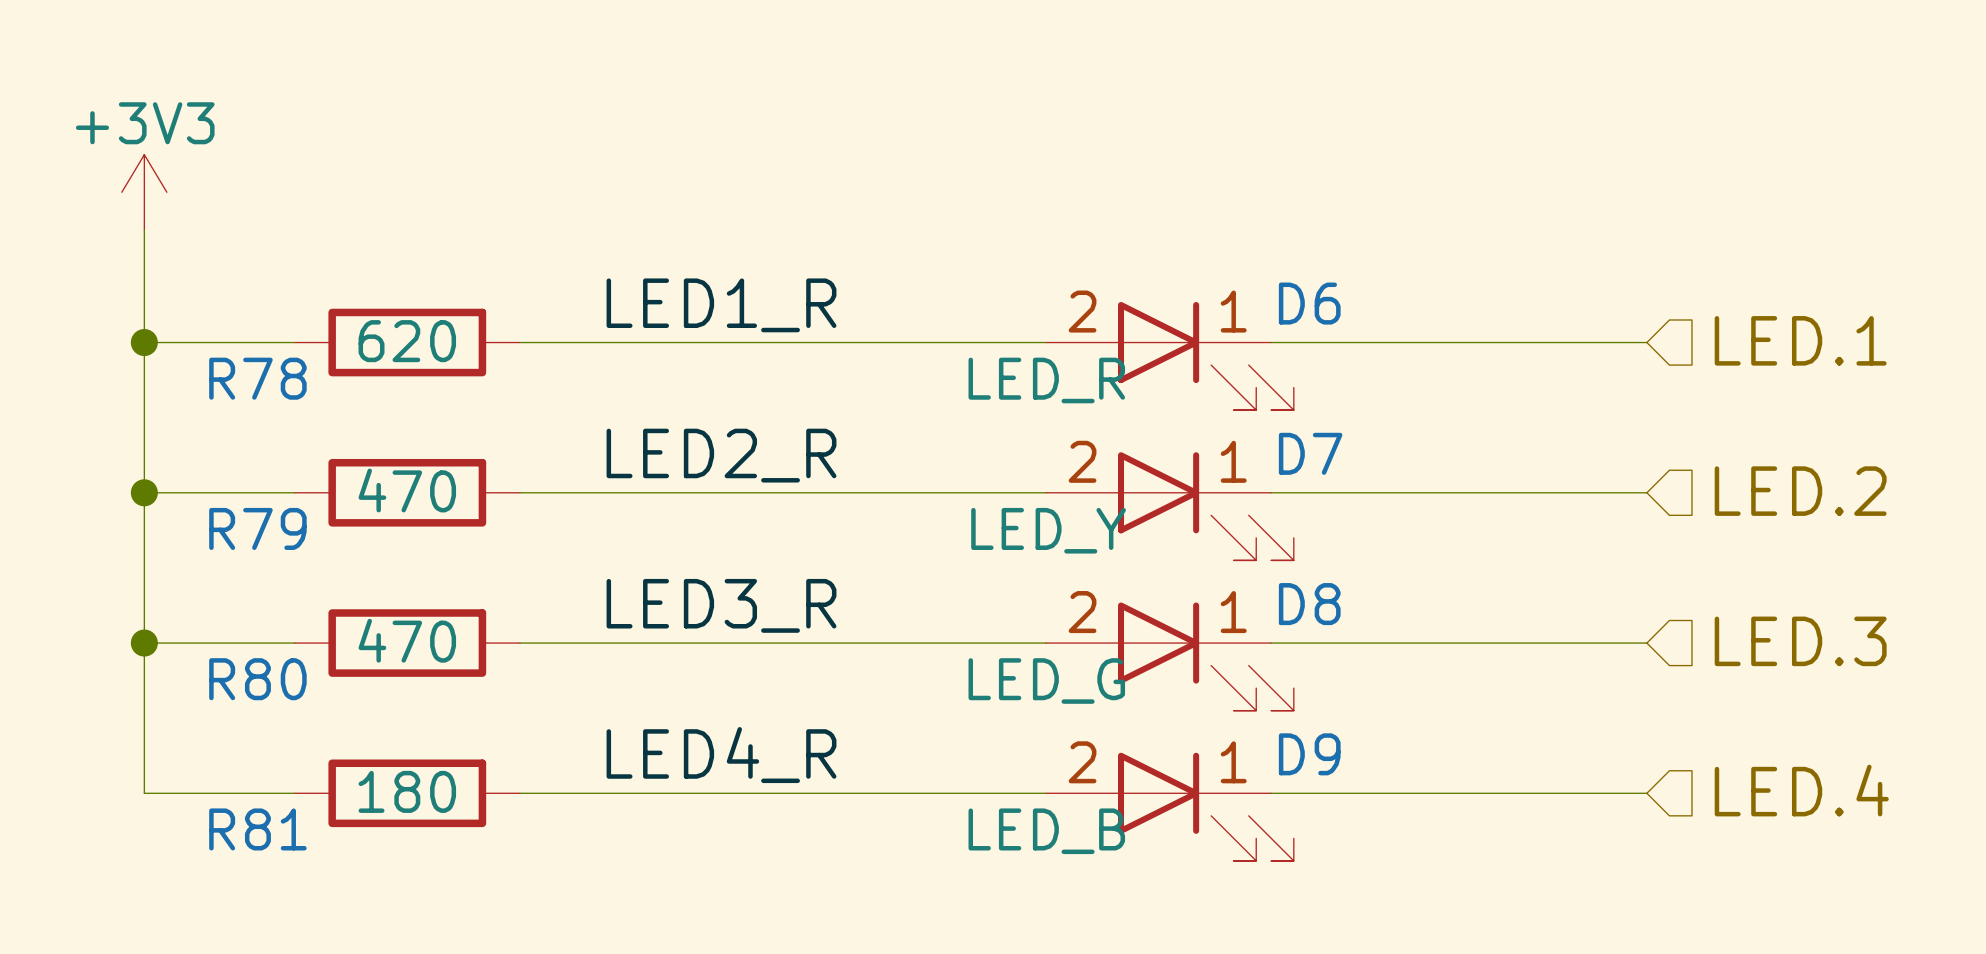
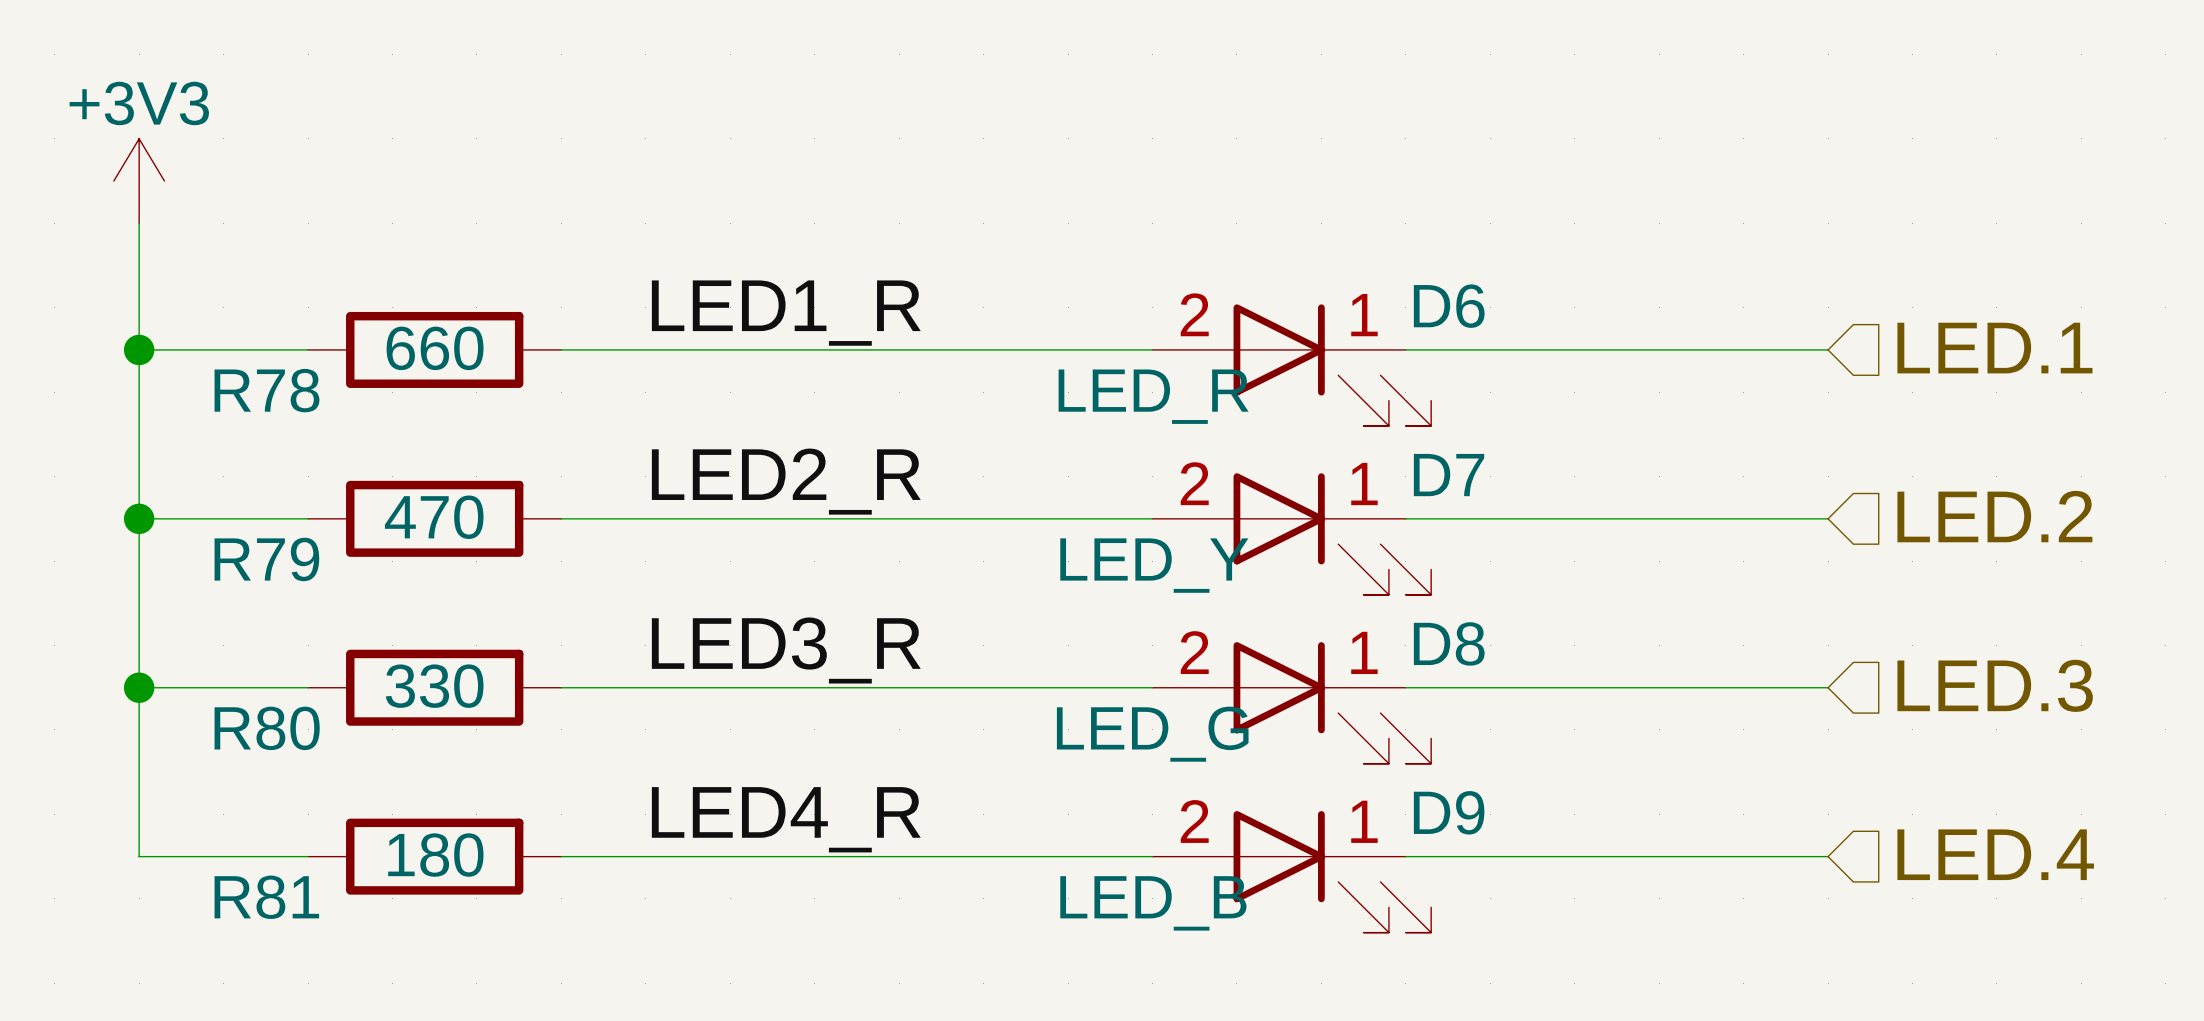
R78 value: 620 (407, 341) -> 660 (435, 348)
R80 value: 470 (407, 640) -> 330 (434, 686)

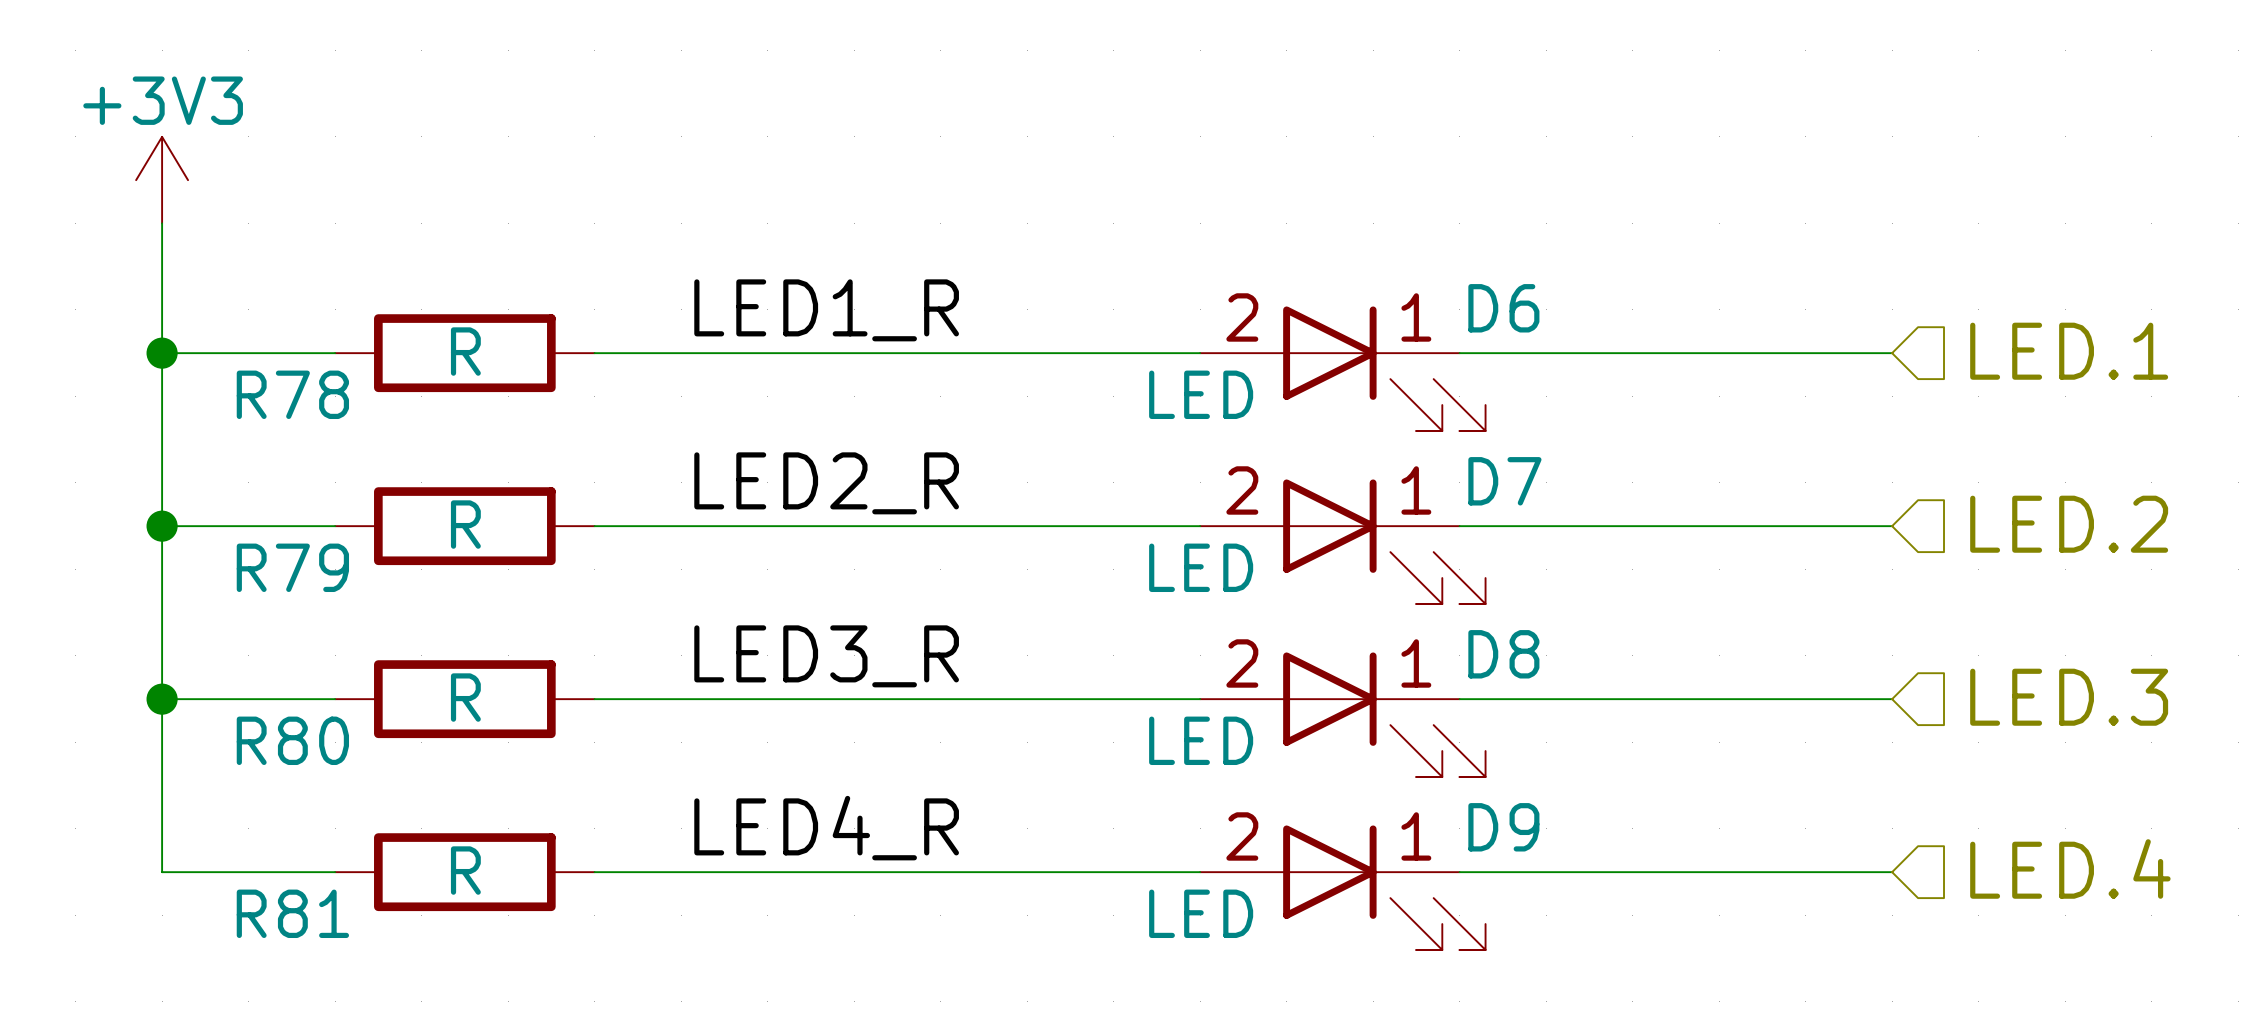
R78 value: 660 (435, 348) -> R (465, 351)
D6 value: LED_R (1153, 396) -> LED (1201, 394)
R79 value: 470 (434, 517) -> R (465, 524)
D7 value: LED_Y (1154, 565) -> LED (1201, 567)
R80 value: 330 (434, 686) -> R (465, 697)
D8 value: LED_G (1152, 734) -> LED (1201, 740)
R81 value: 180 (435, 855) -> R (465, 870)
D9 value: LED_B (1153, 903) -> LED (1201, 913)

